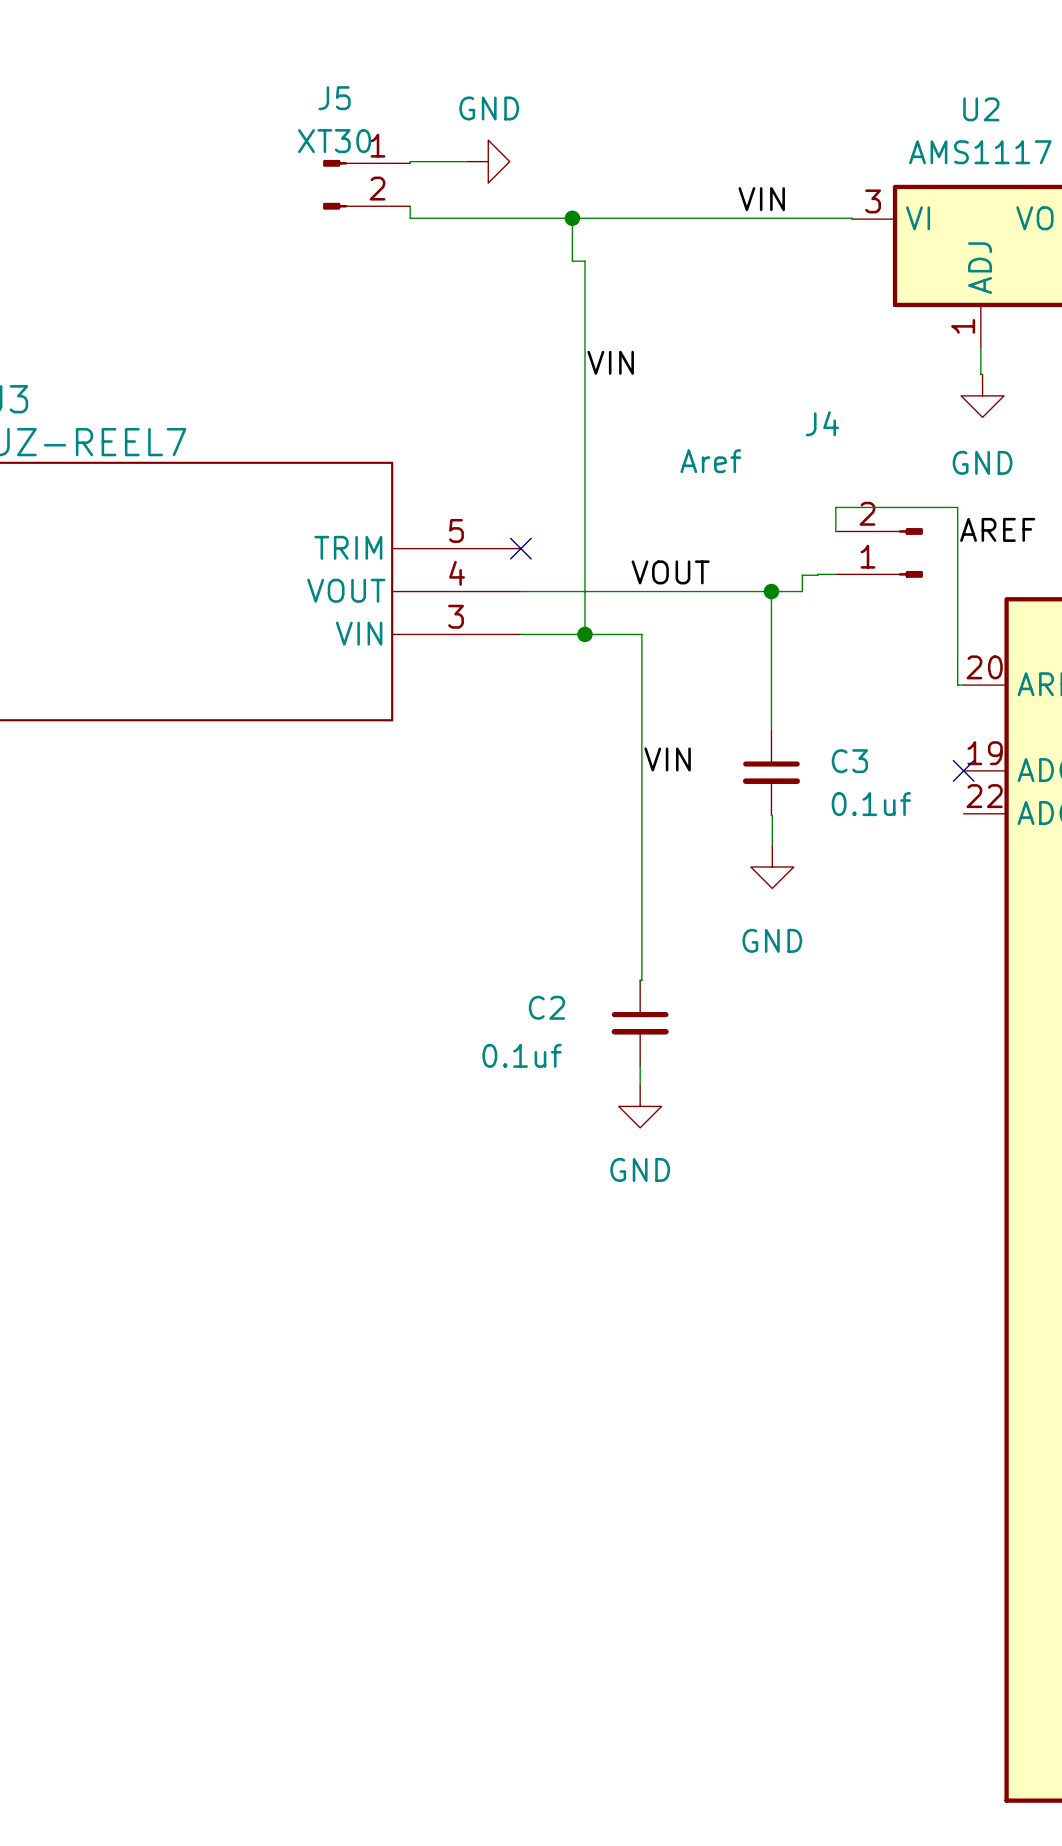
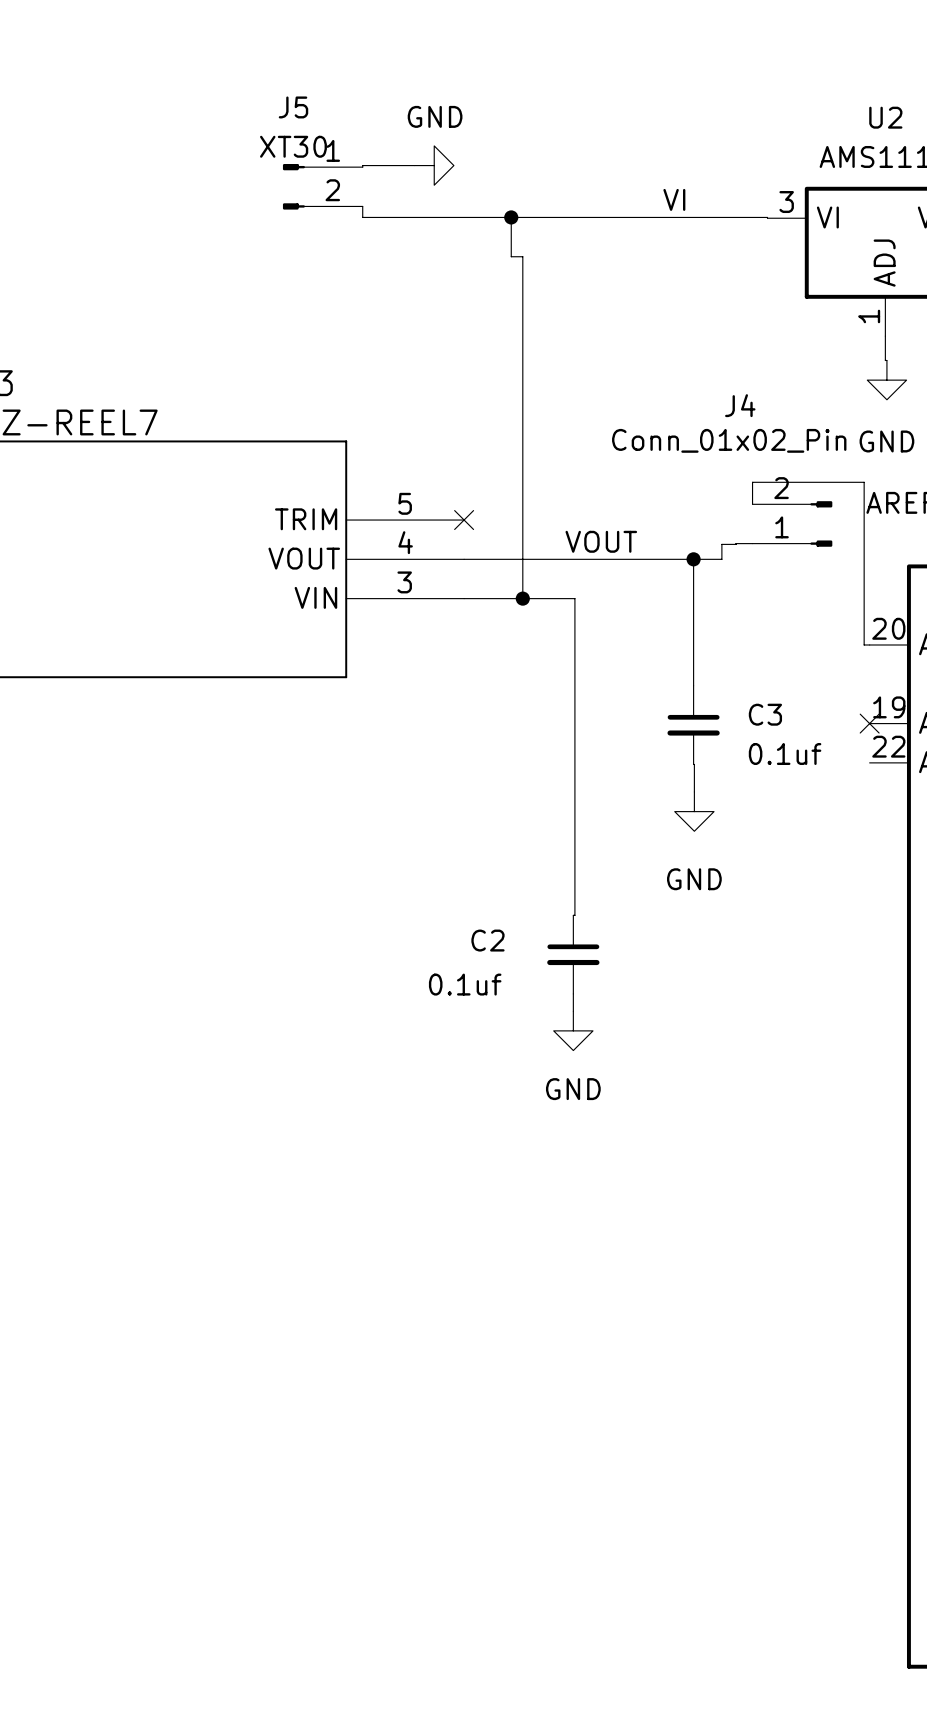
label: VIN (761, 199) -> VI (674, 199)
label: VIN (610, 362) -> none
J4 value: Aref (710, 461) -> Conn_01x02_Pin (729, 440)
label: VIN (667, 759) -> none

